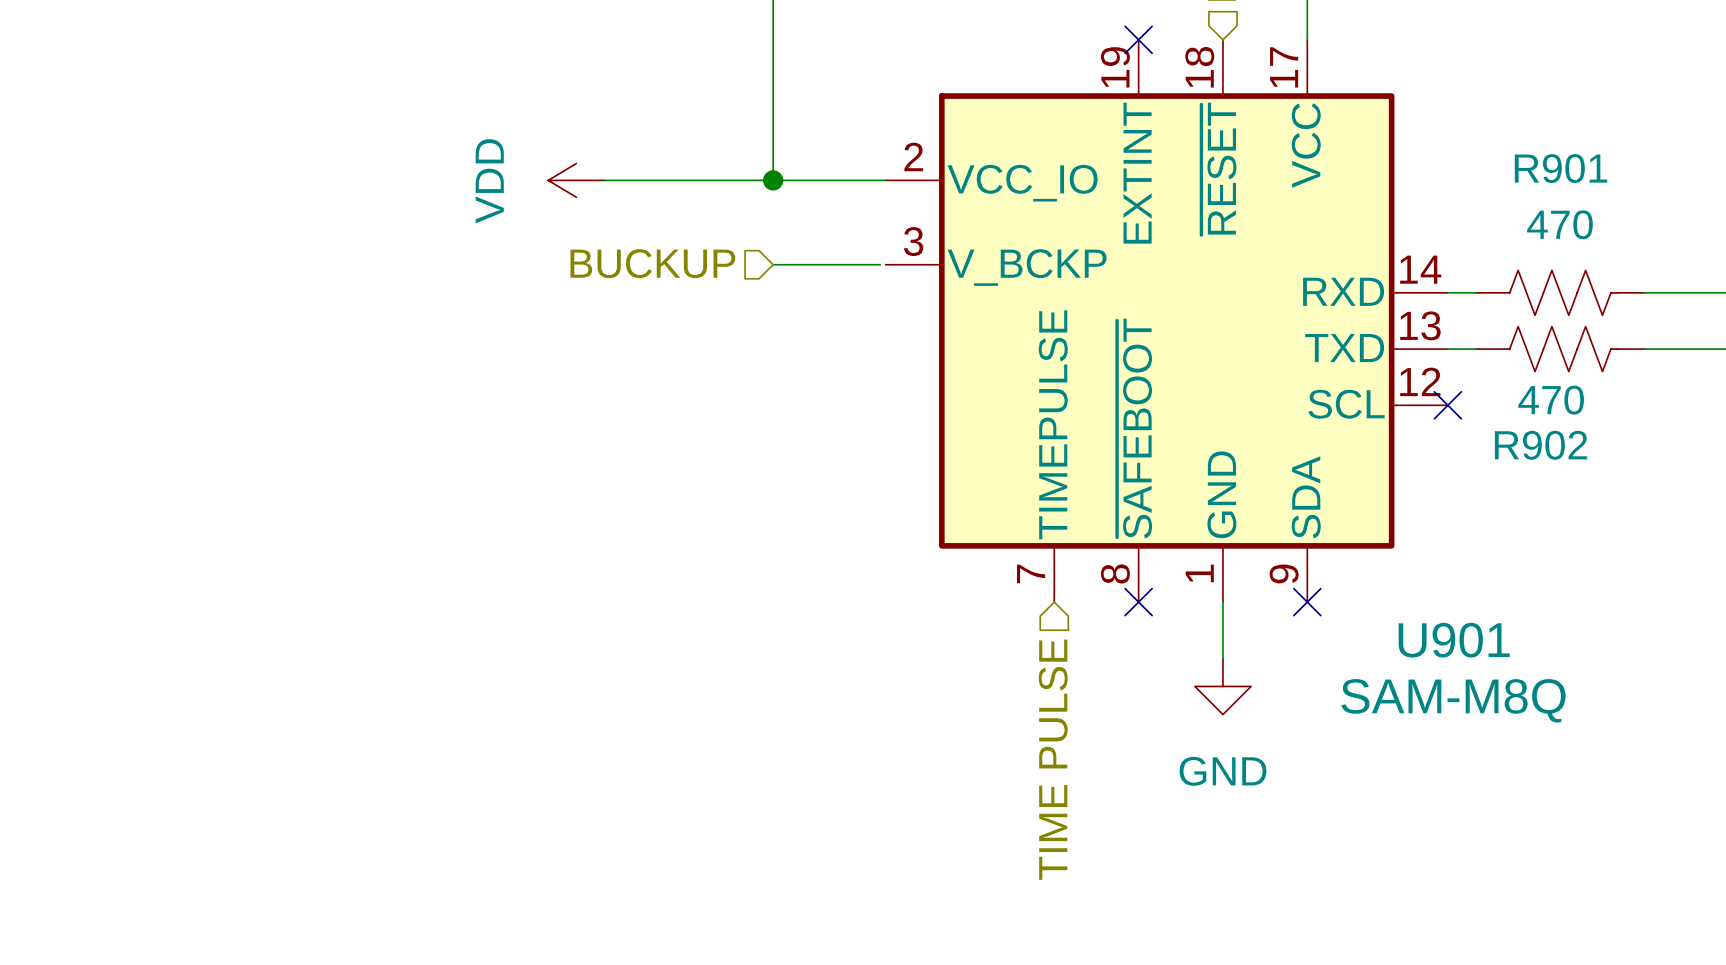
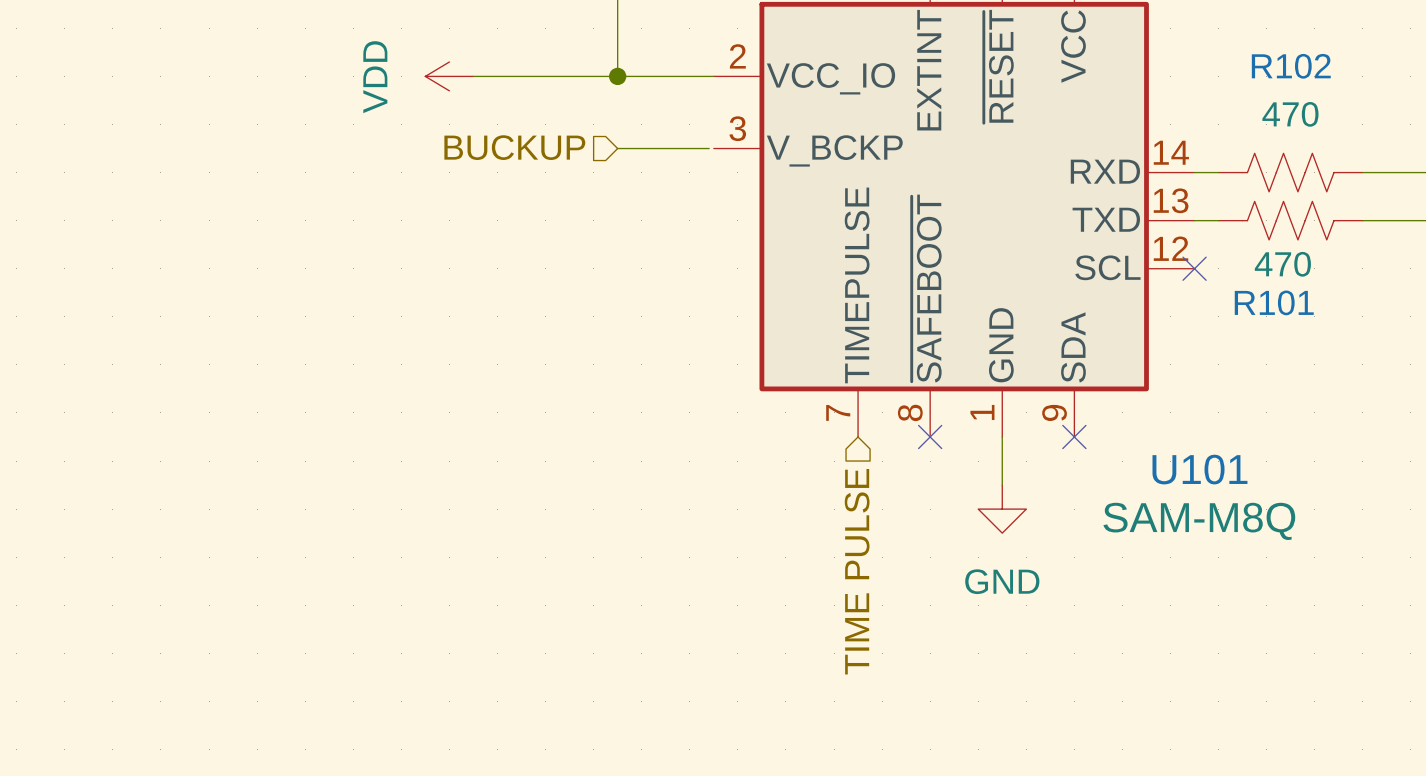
R901 name: R901 (1561, 168) -> R102 (1291, 66)
R902 name: R902 (1541, 445) -> R101 (1274, 302)
U901 name: U901 (1454, 640) -> U101 (1199, 469)

